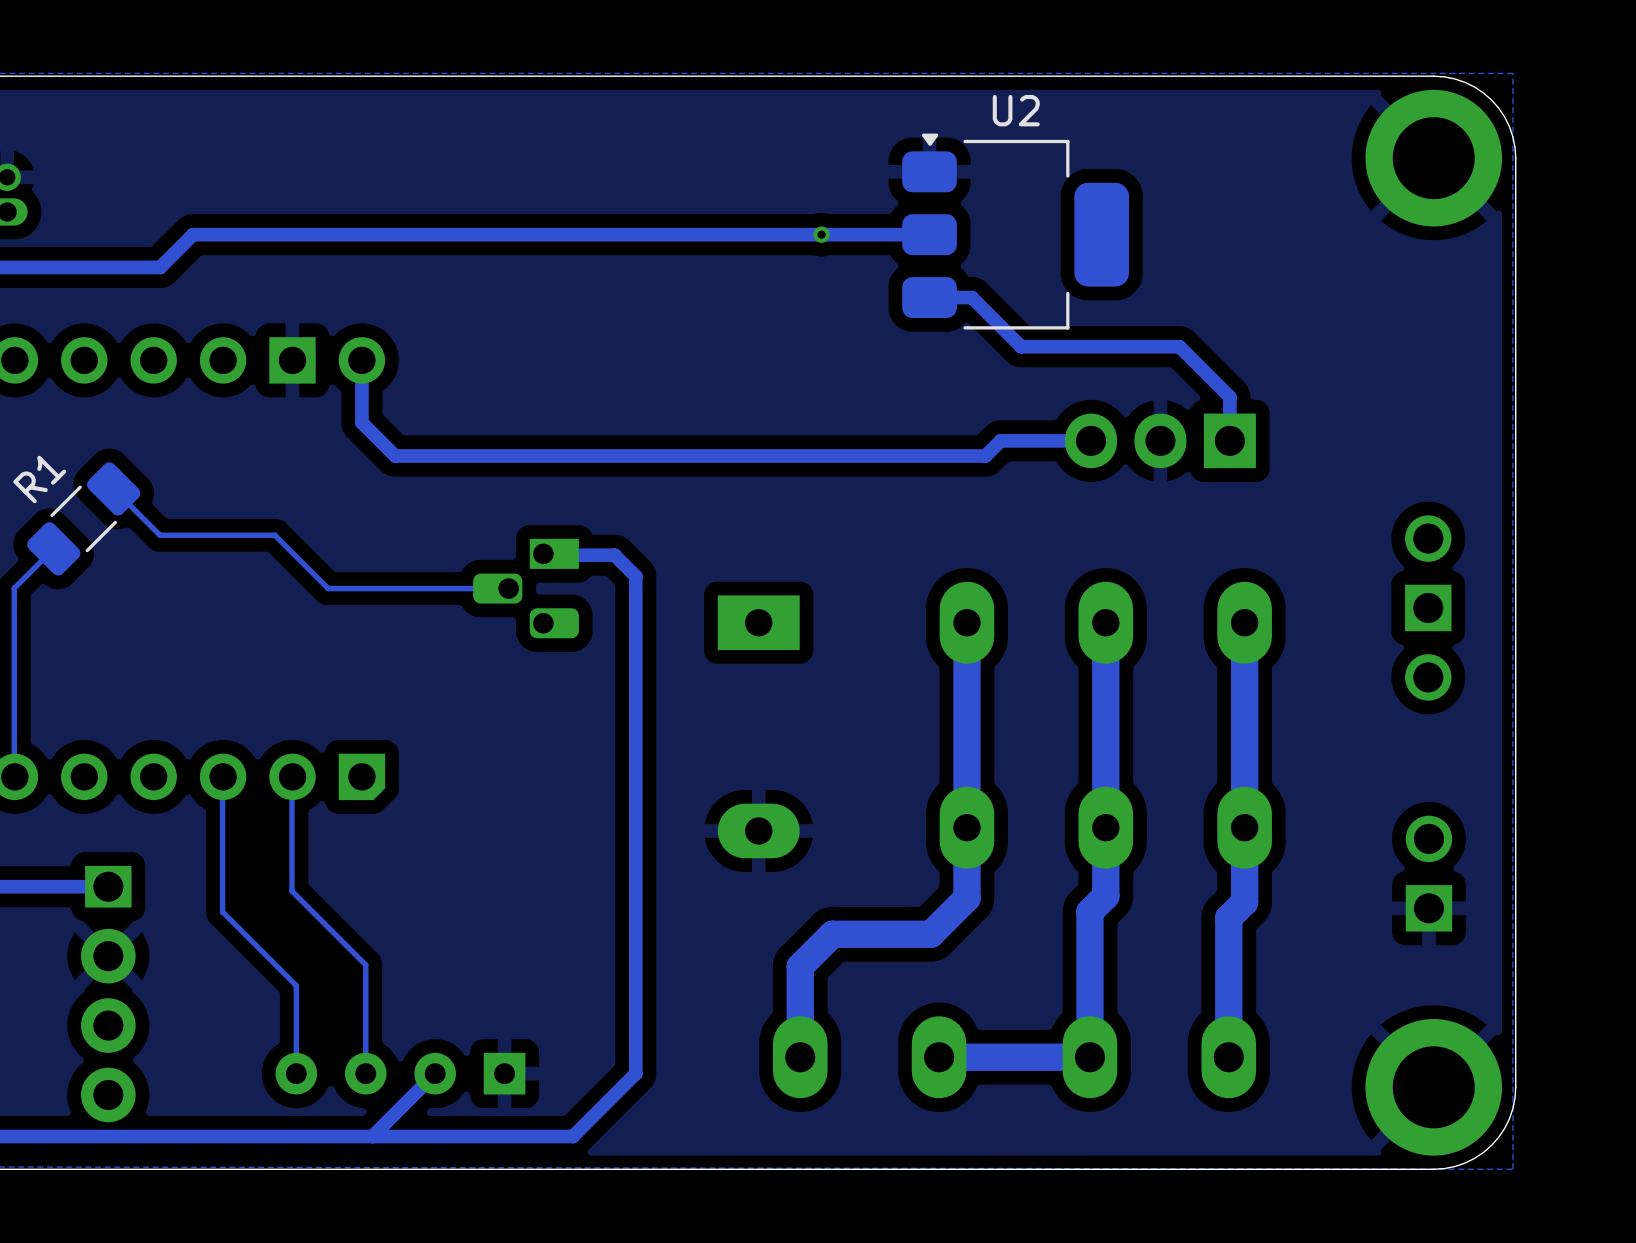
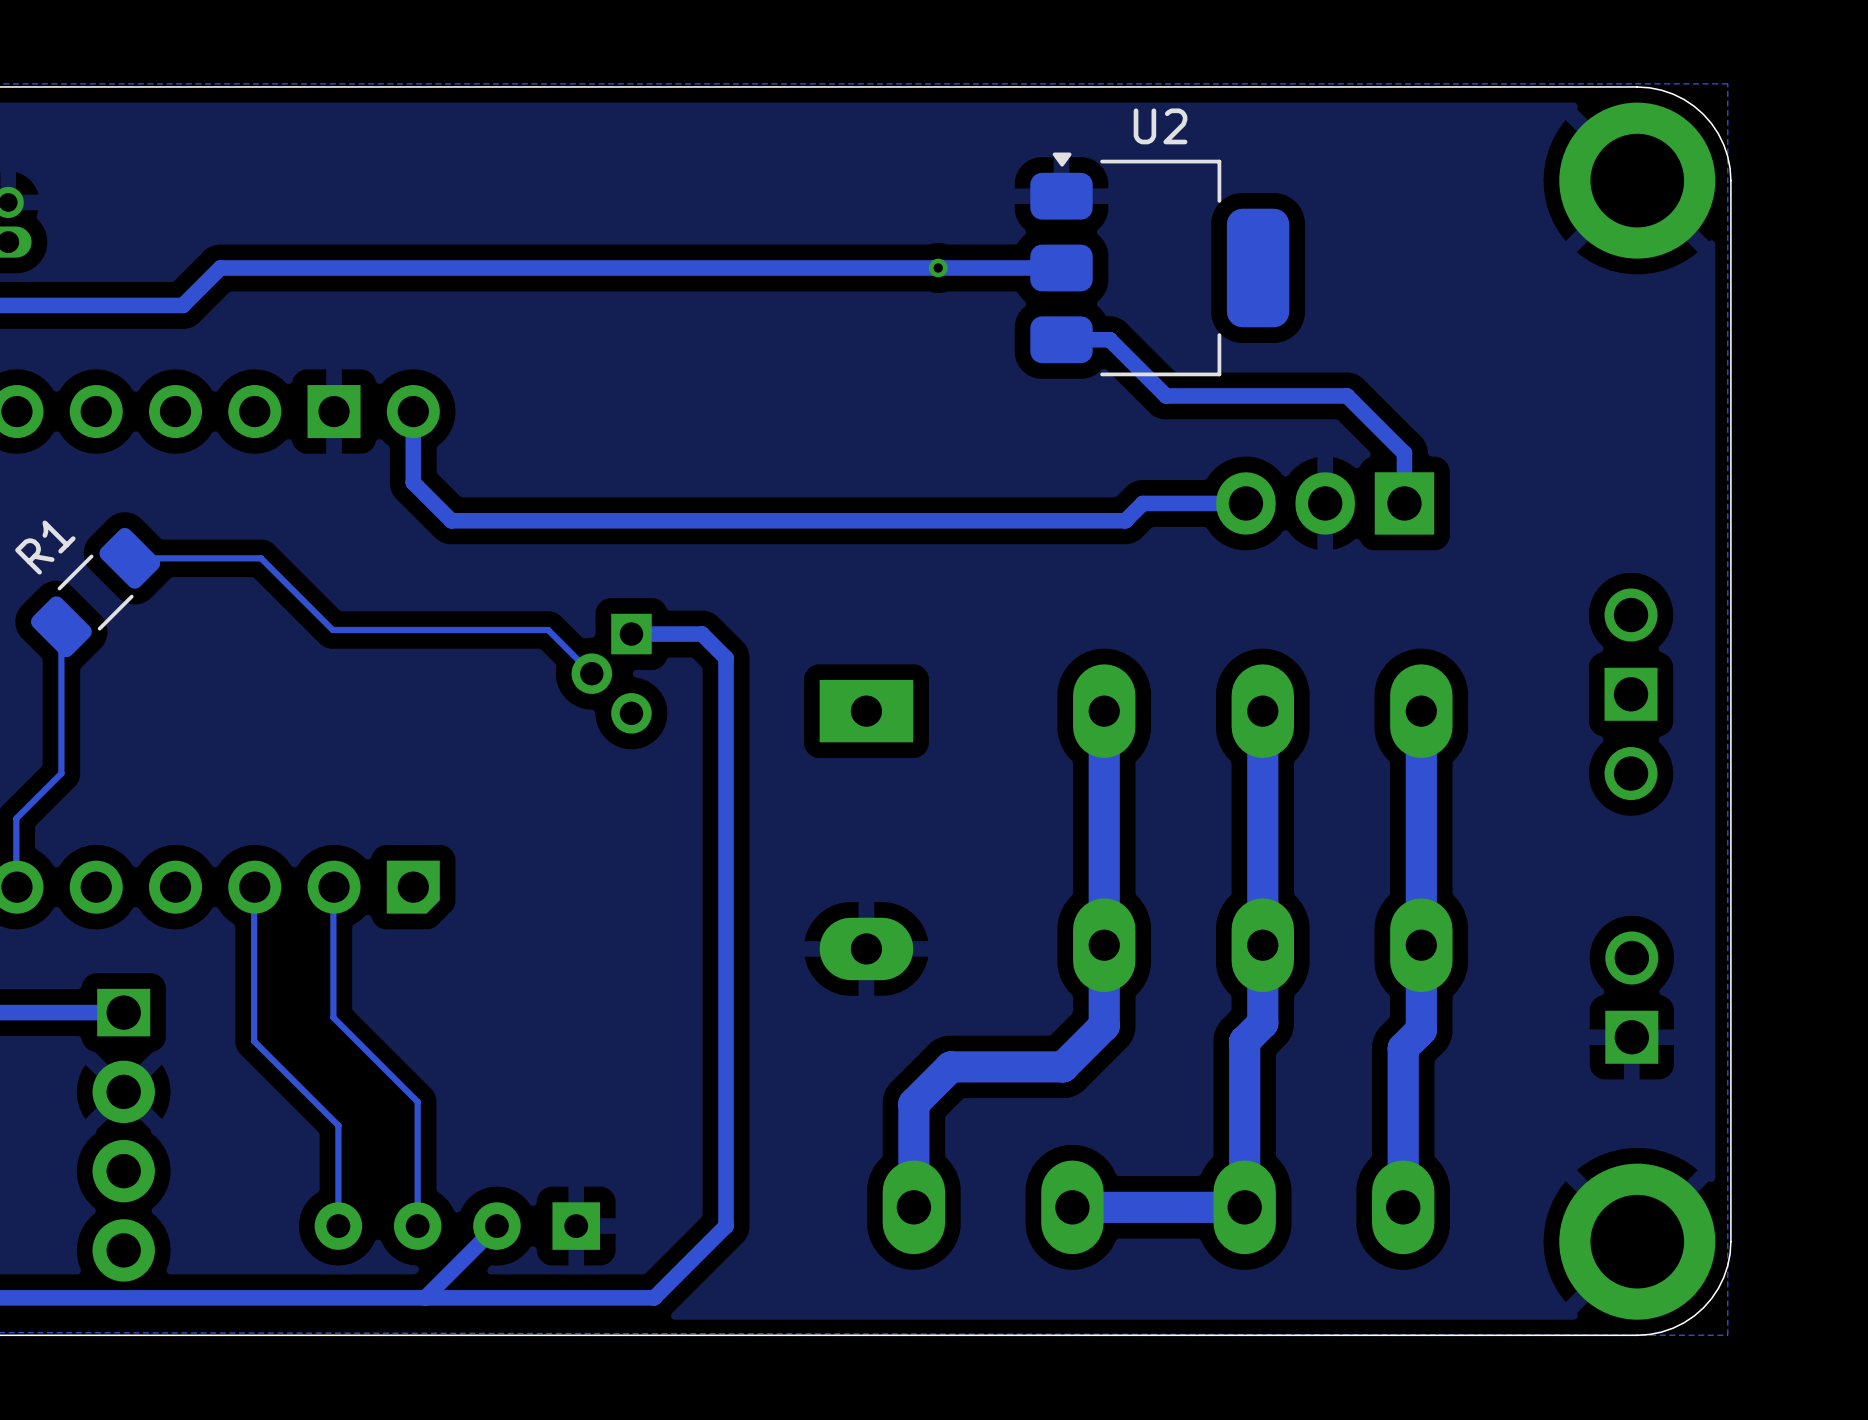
track: (113, 488) (160, 535) (274, 535) -> (129, 558) (261, 558) (314, 611)
part footprint: [473, 538, 579, 639] -> [571, 613, 652, 734]
track: (53, 548) (14, 588) (14, 716) -> (61, 626) (61, 773) (16, 818)
track: (291, 551) (328, 588) (508, 588) -> (332, 630) (548, 630) (591, 673)

